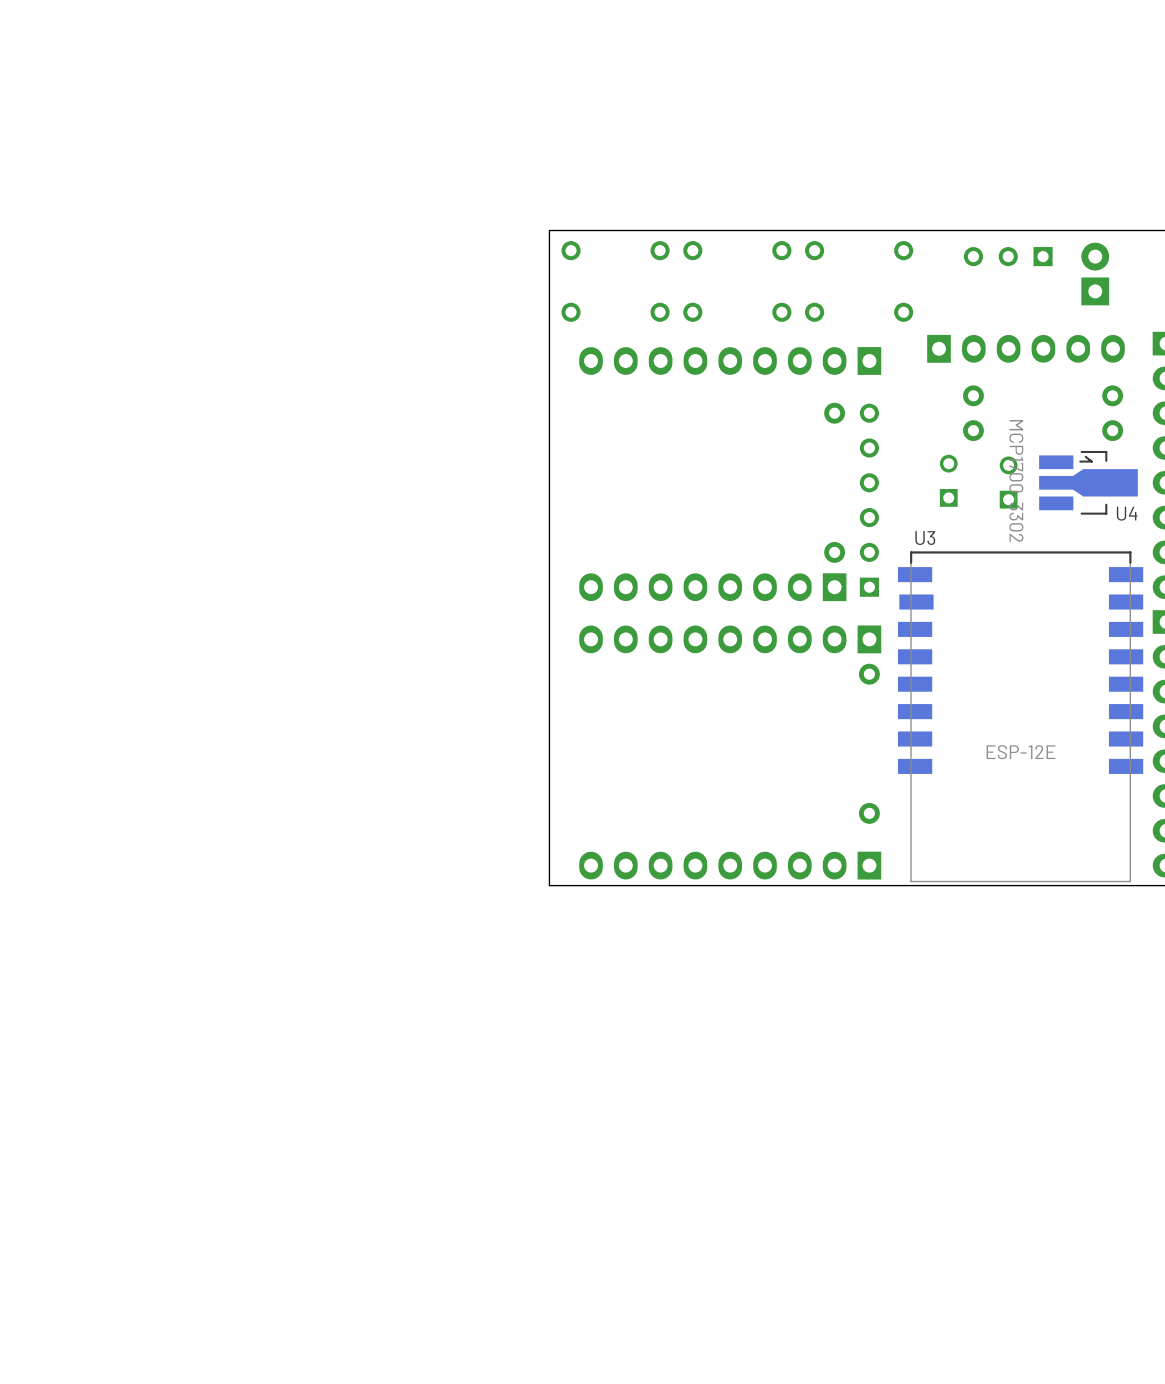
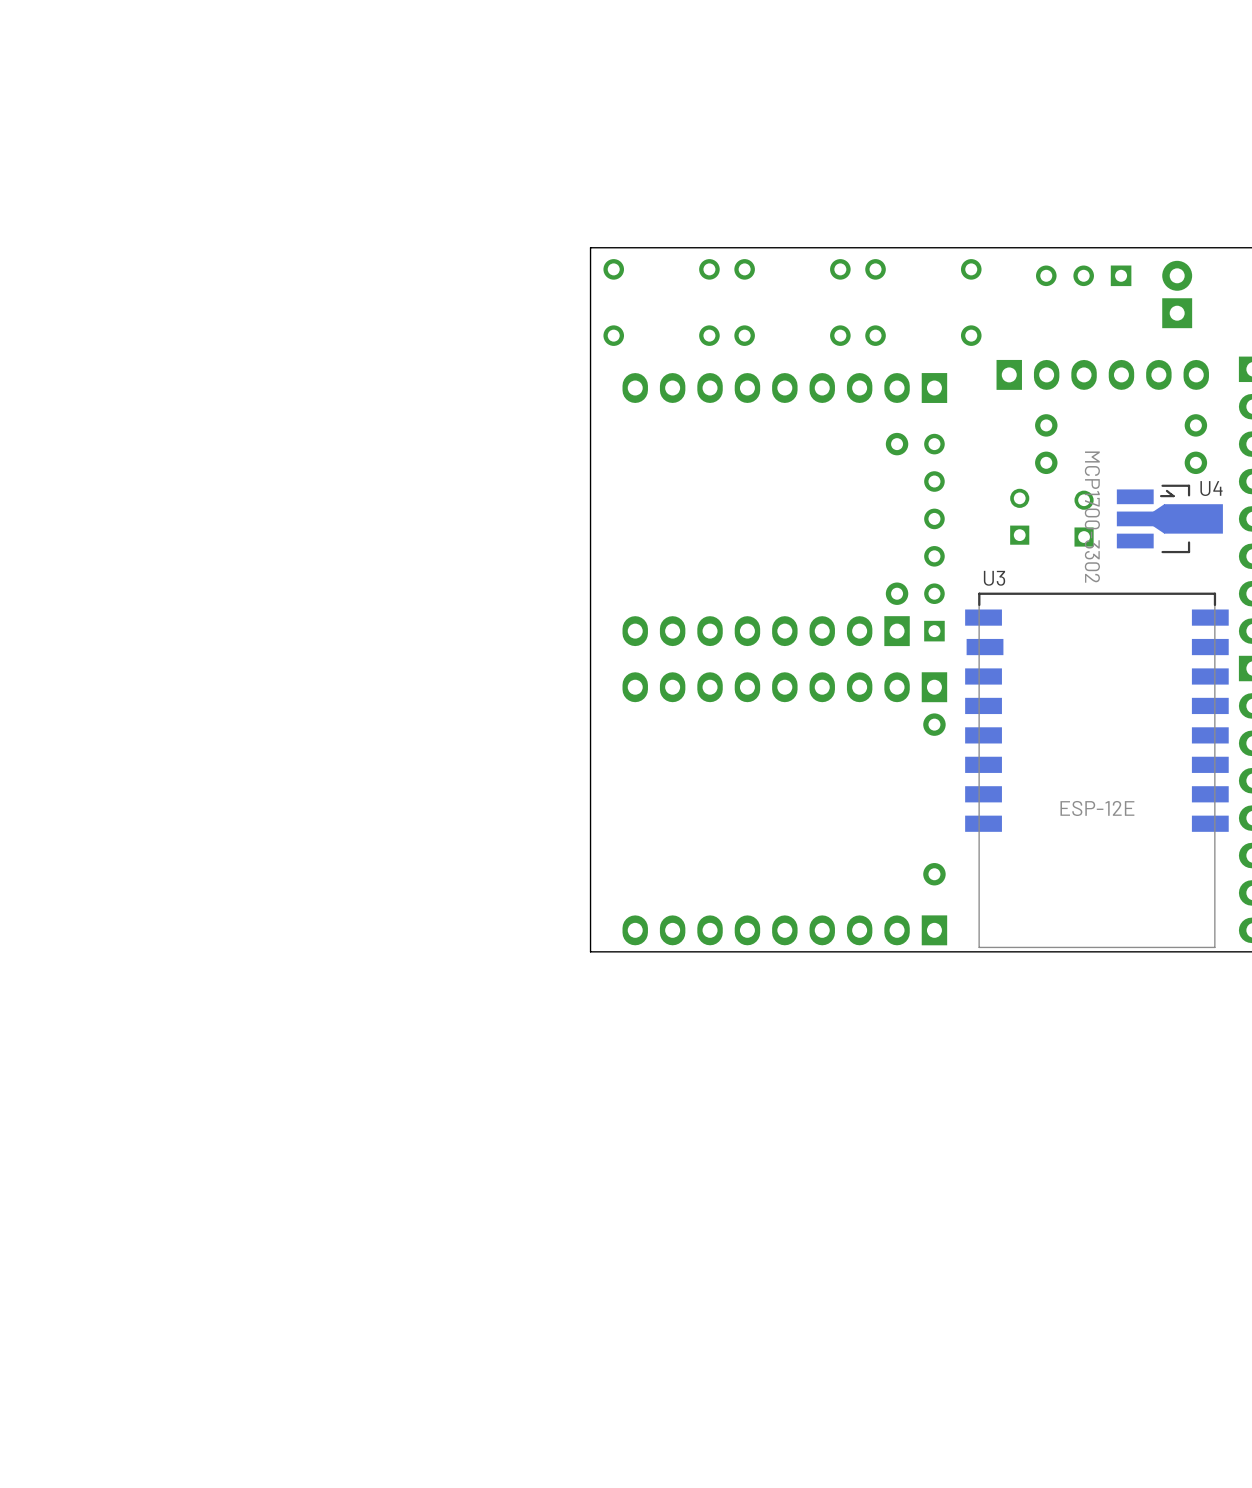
U4 name position: U4 (1127, 513) -> U4 (1211, 488)

